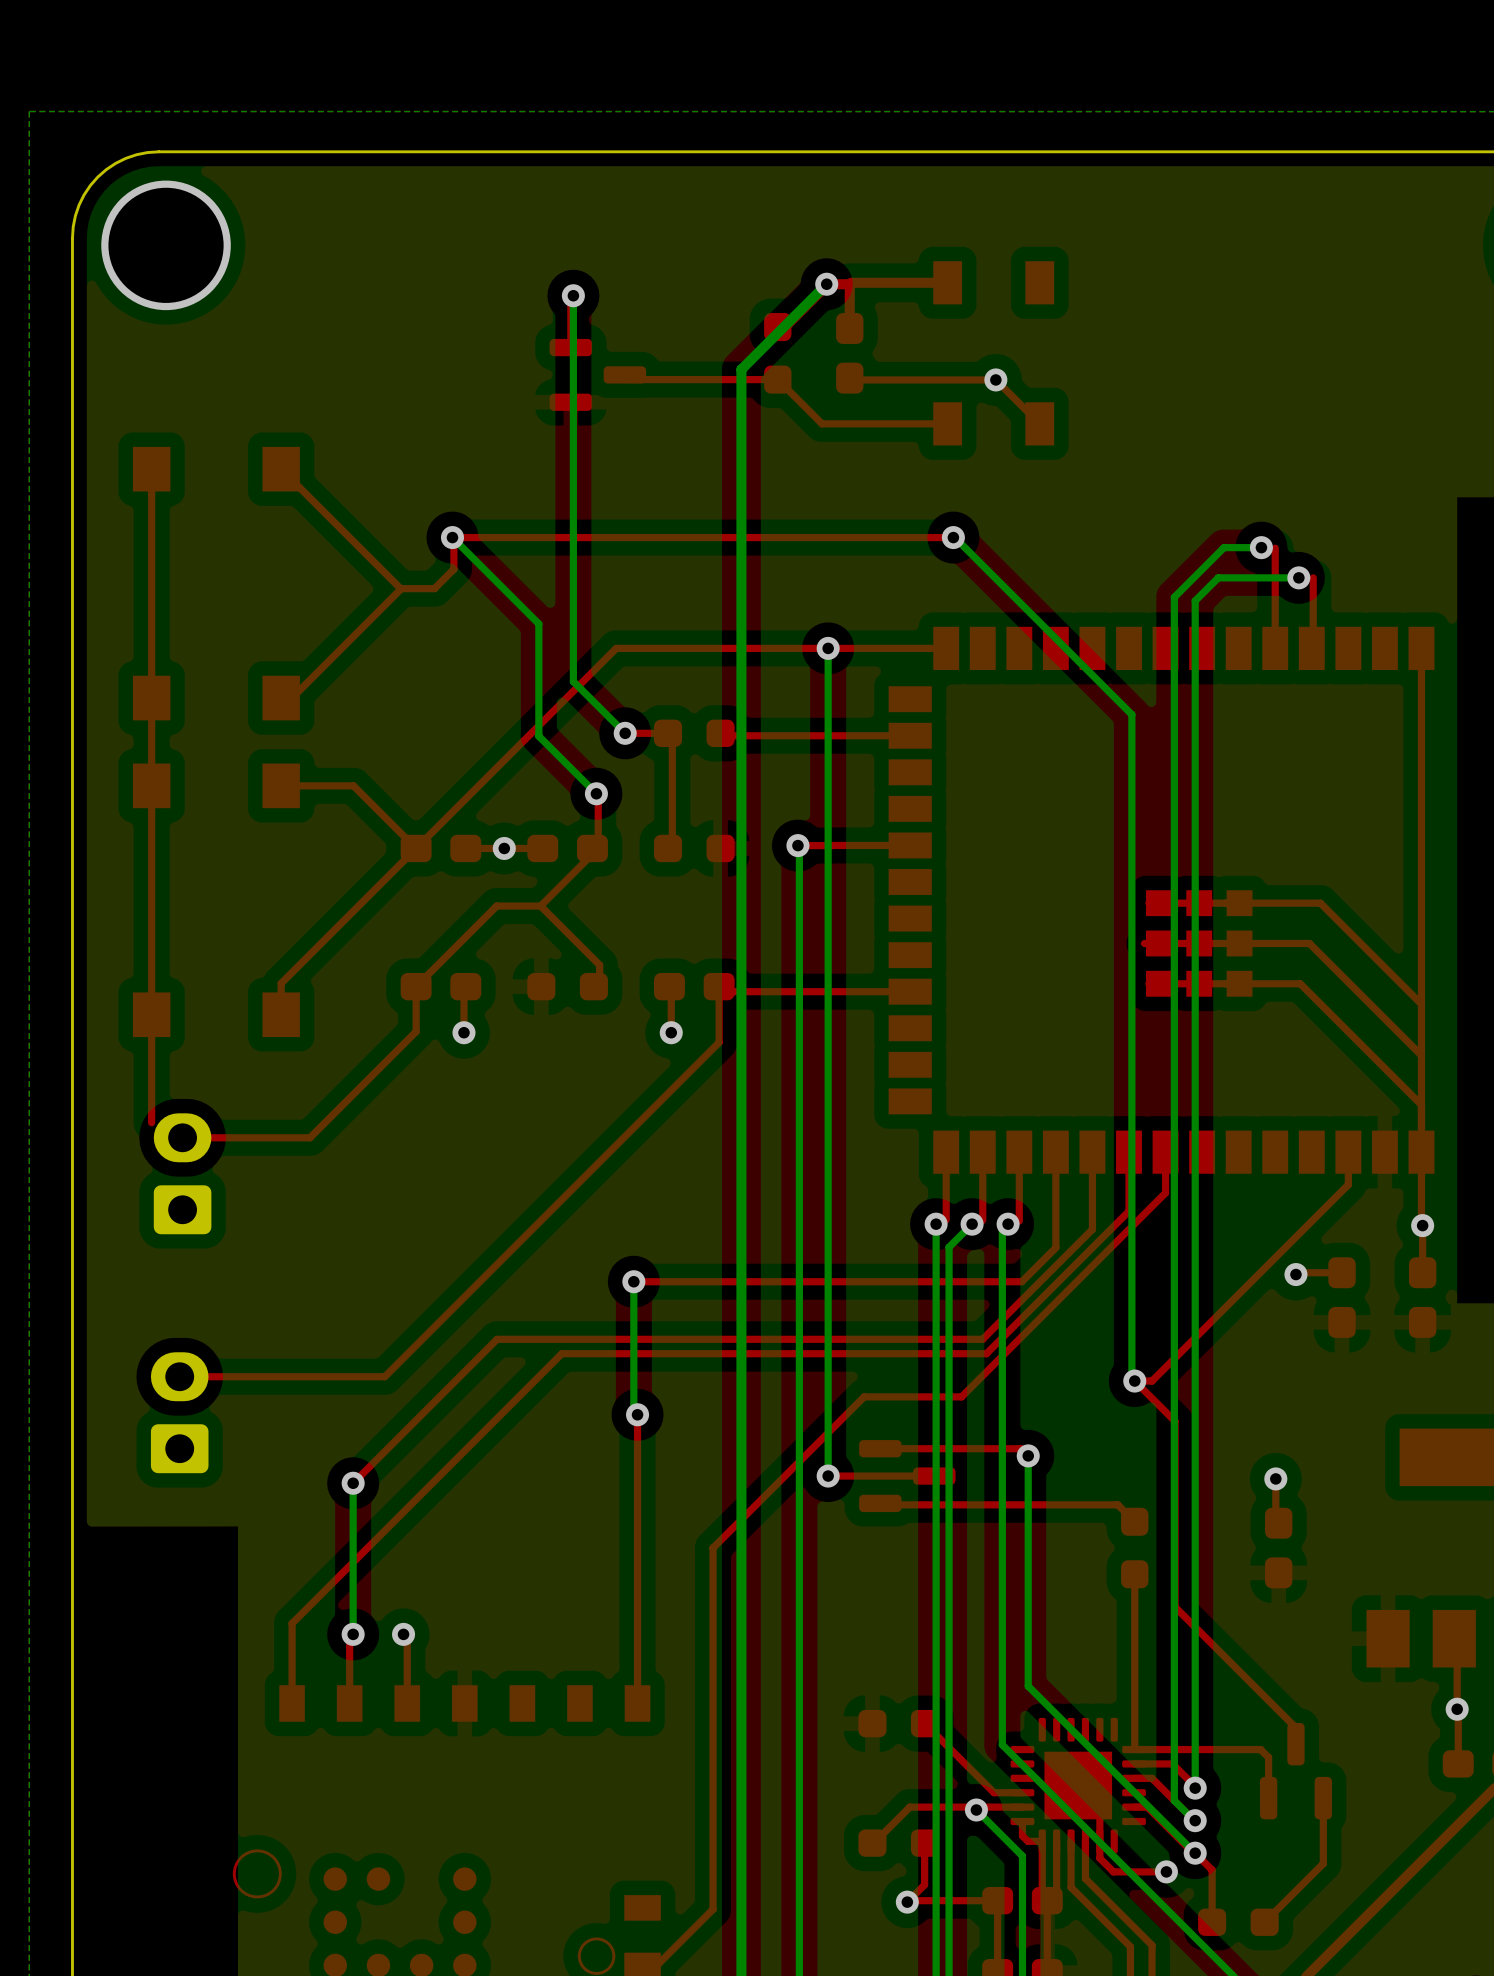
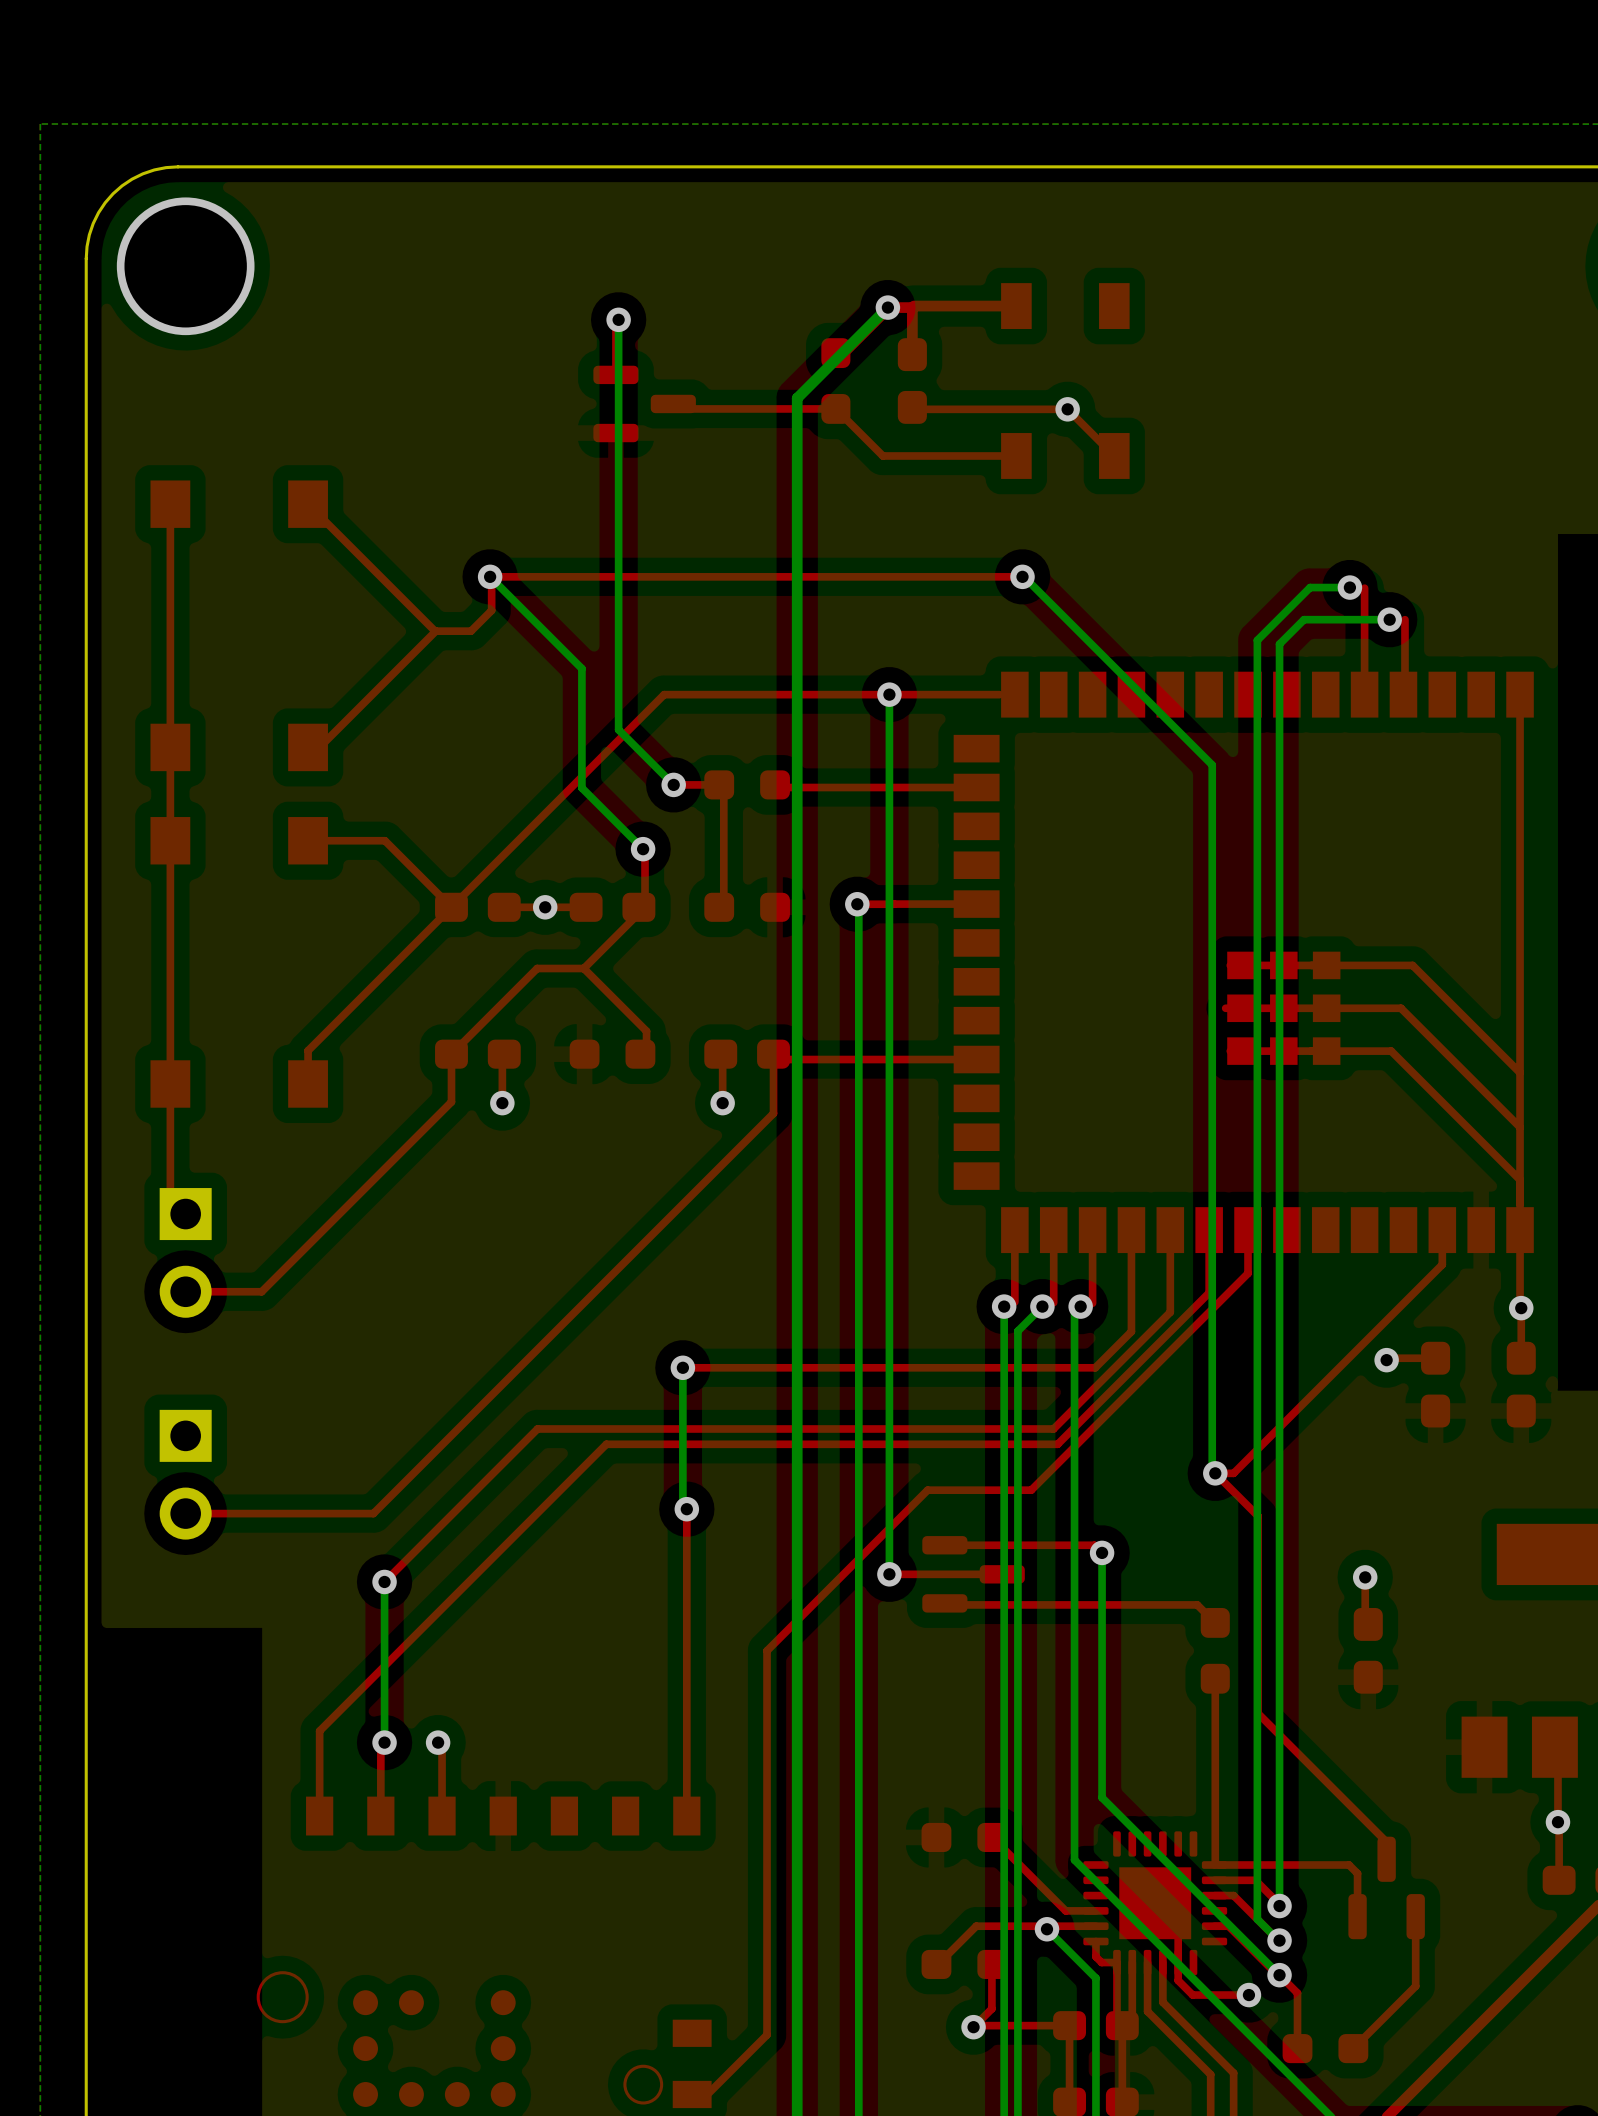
part footprint: [153, 1113, 212, 1235] -> [159, 1188, 212, 1318]
top track: (309, 1137) (182, 1137) -> (338, 1214) (261, 1291) (185, 1291)
top track: (384, 1376) (179, 1376) -> (418, 1468) (373, 1513) (185, 1513)
part: none -> (185, 1474)
part: (179, 1412) -> none

